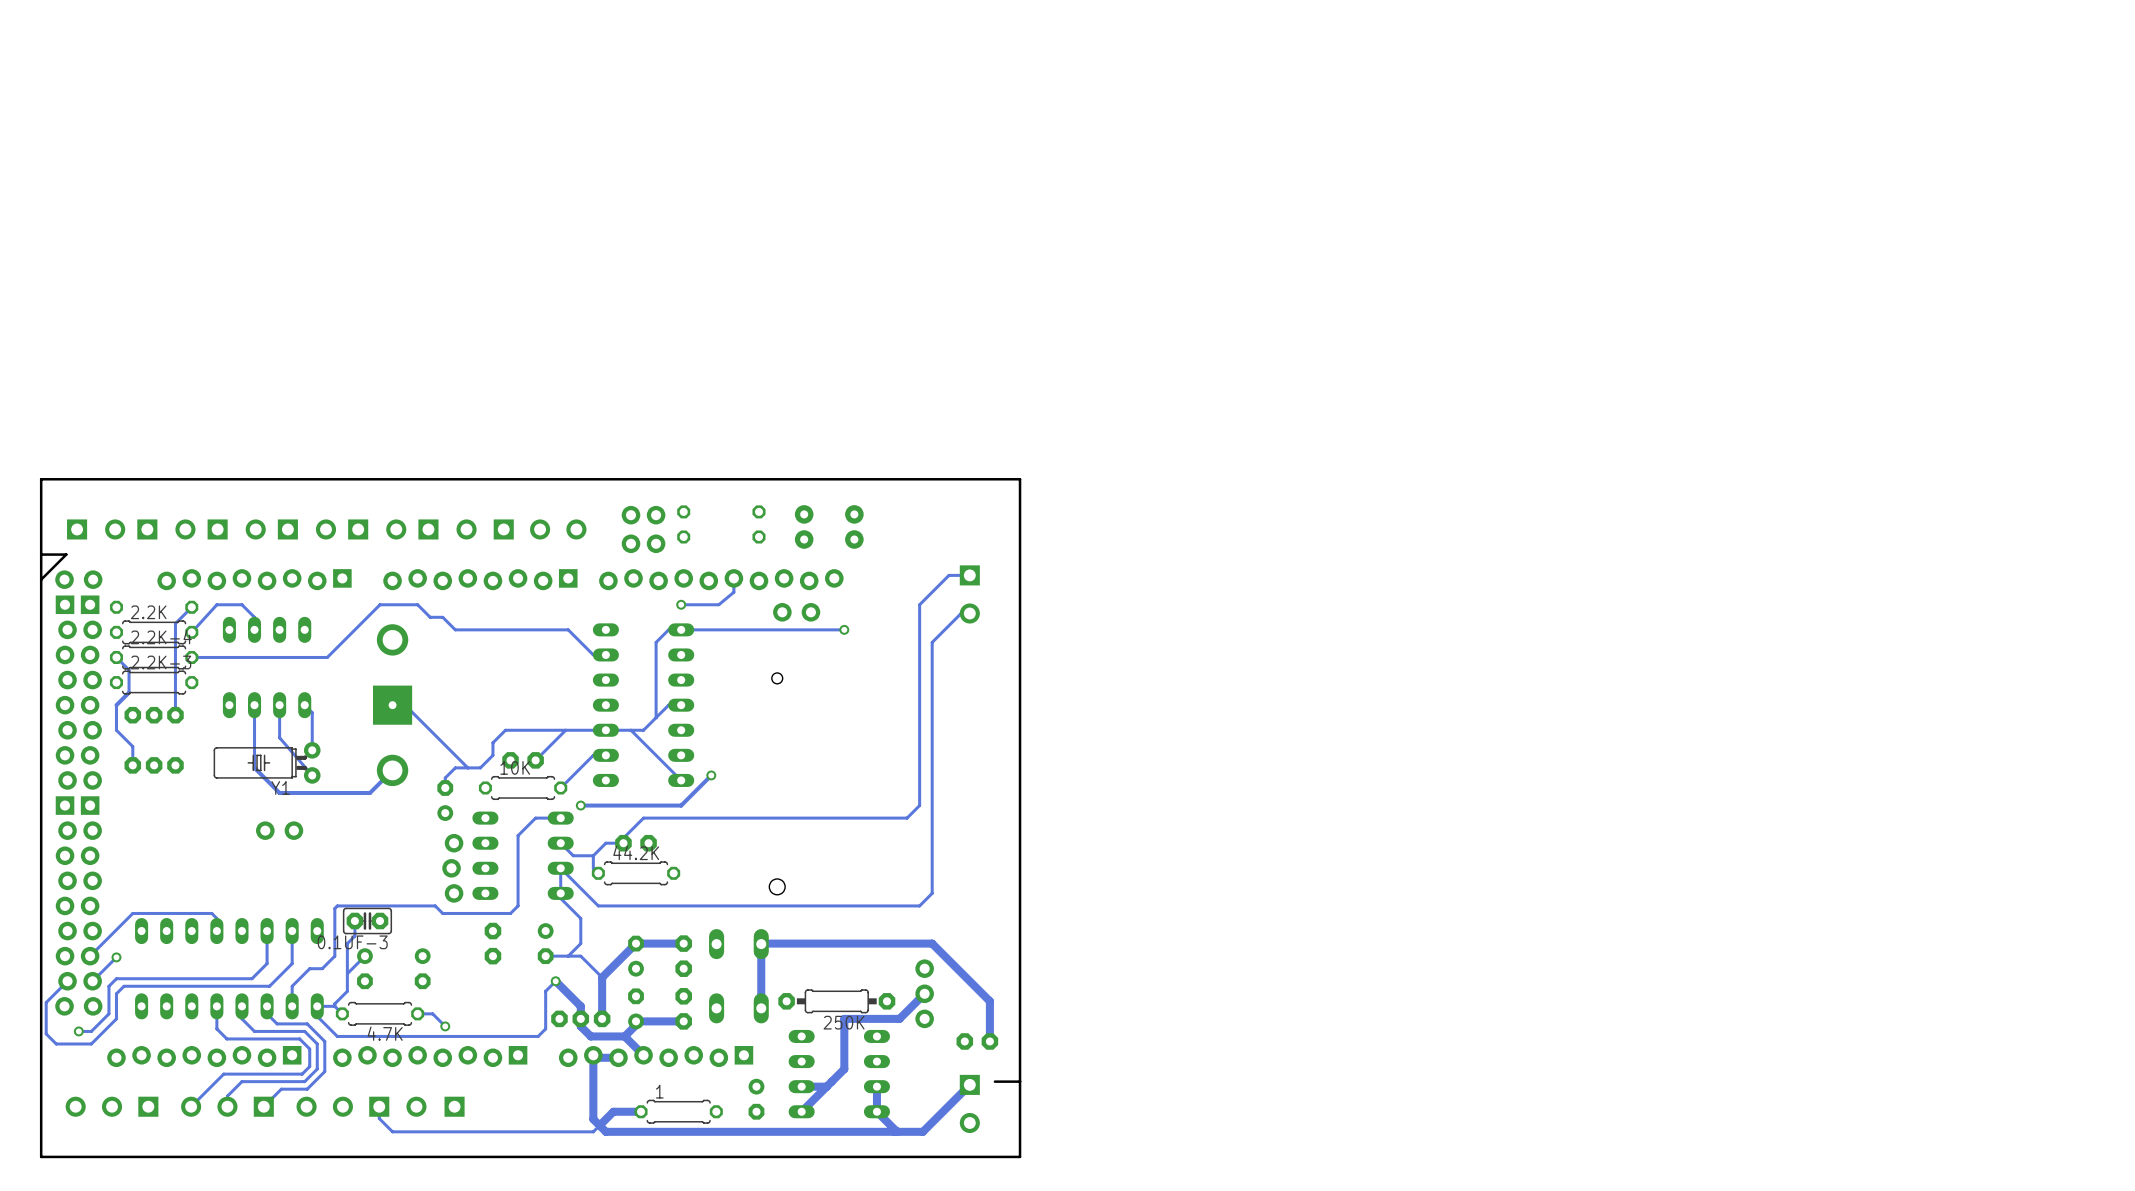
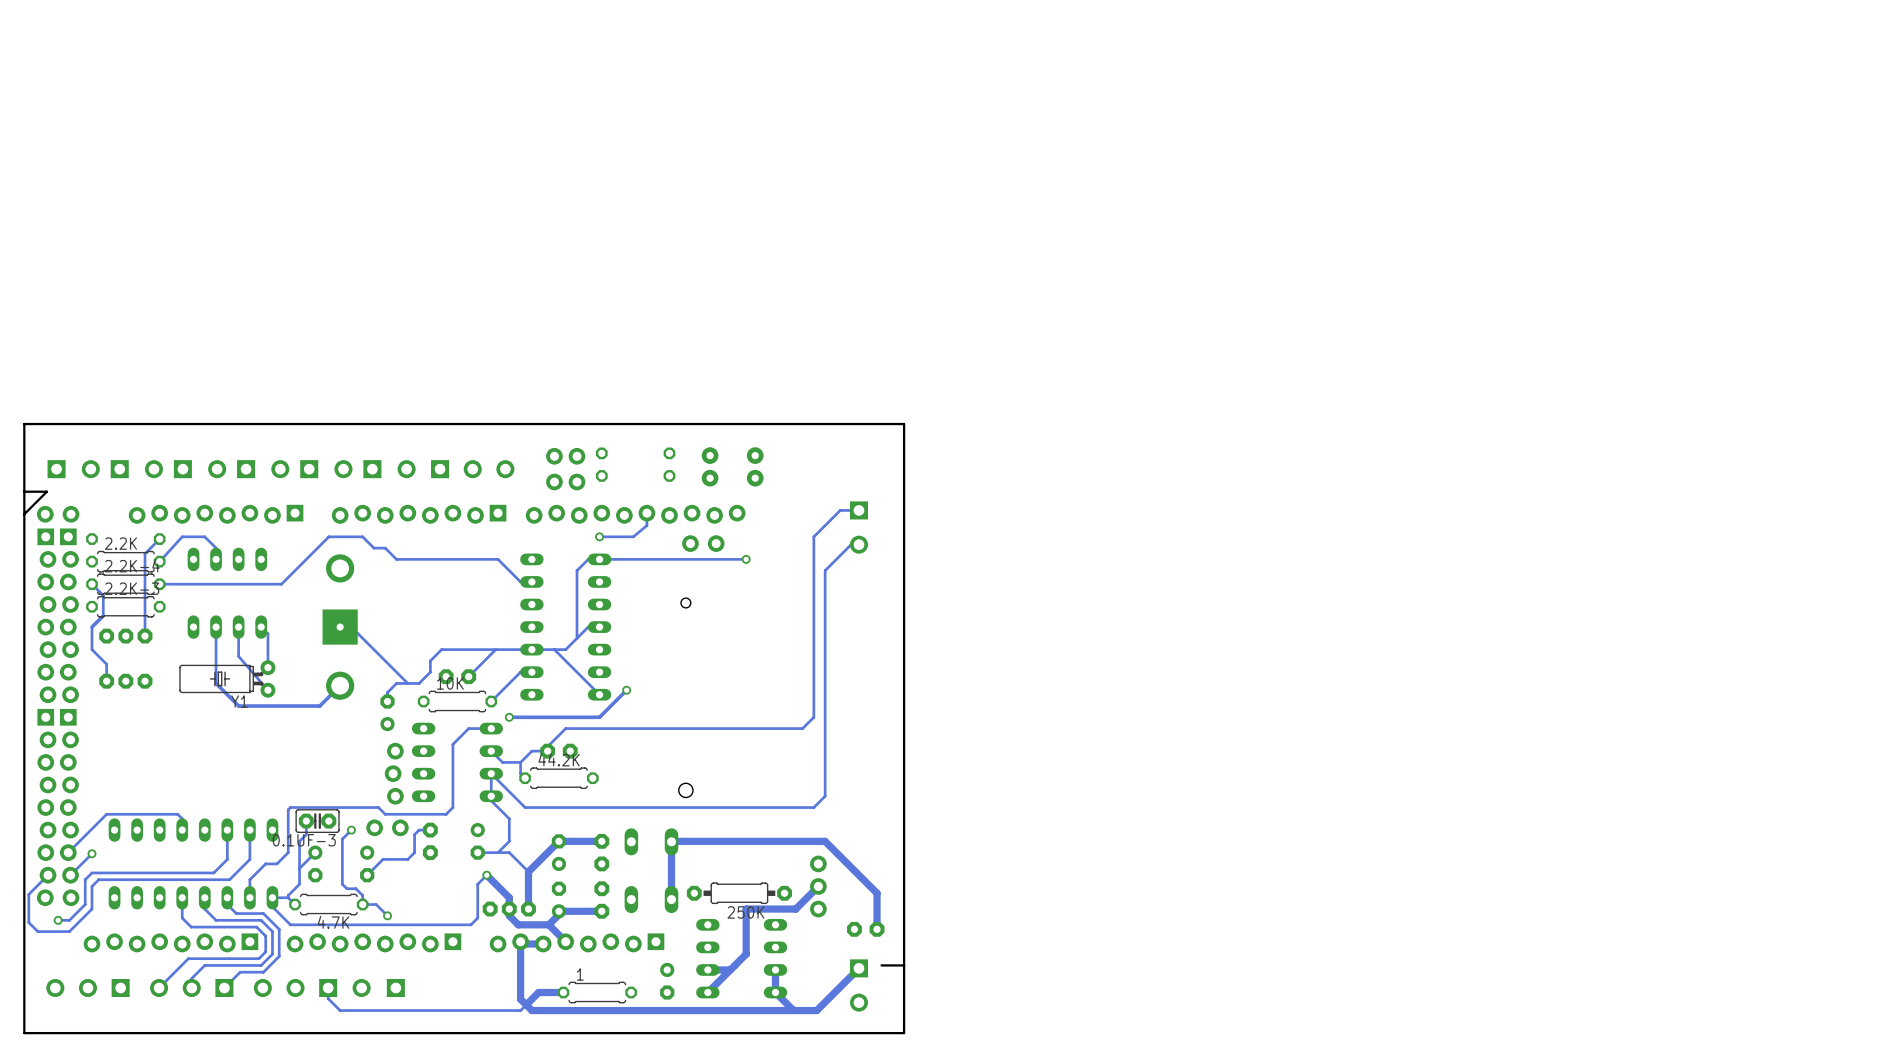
part position: (279, 830) -> (387, 827)
track: none -> (351, 830) (342, 839) (342, 884) (346, 888) (355, 888) (362, 895) (362, 904)
via: none -> (351, 830)
track: none -> (430, 830) (419, 830) (414, 834) (414, 852) (407, 859) (383, 859) (367, 875)

